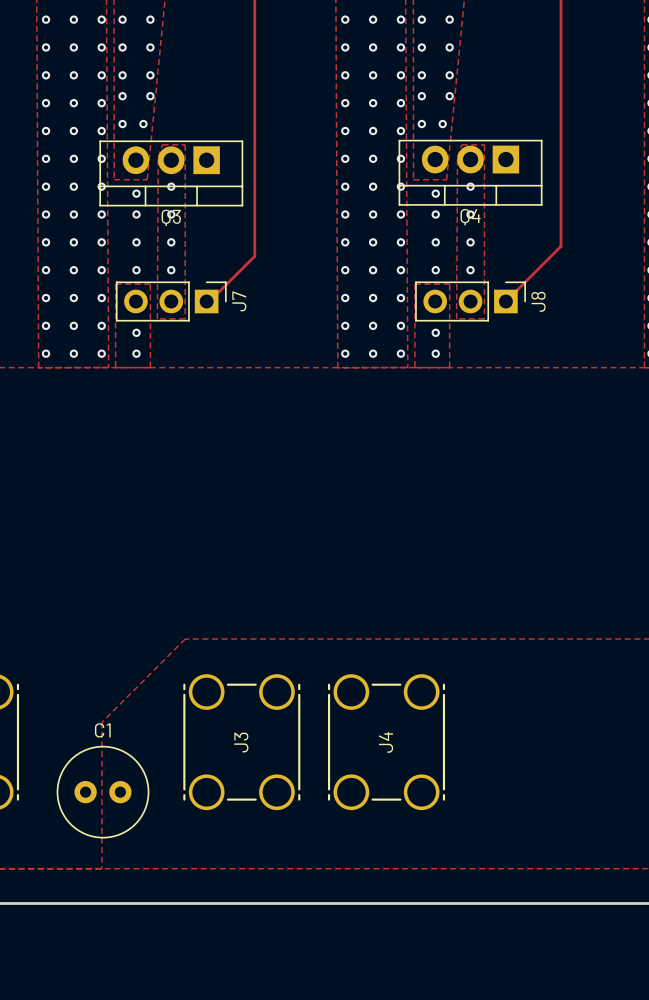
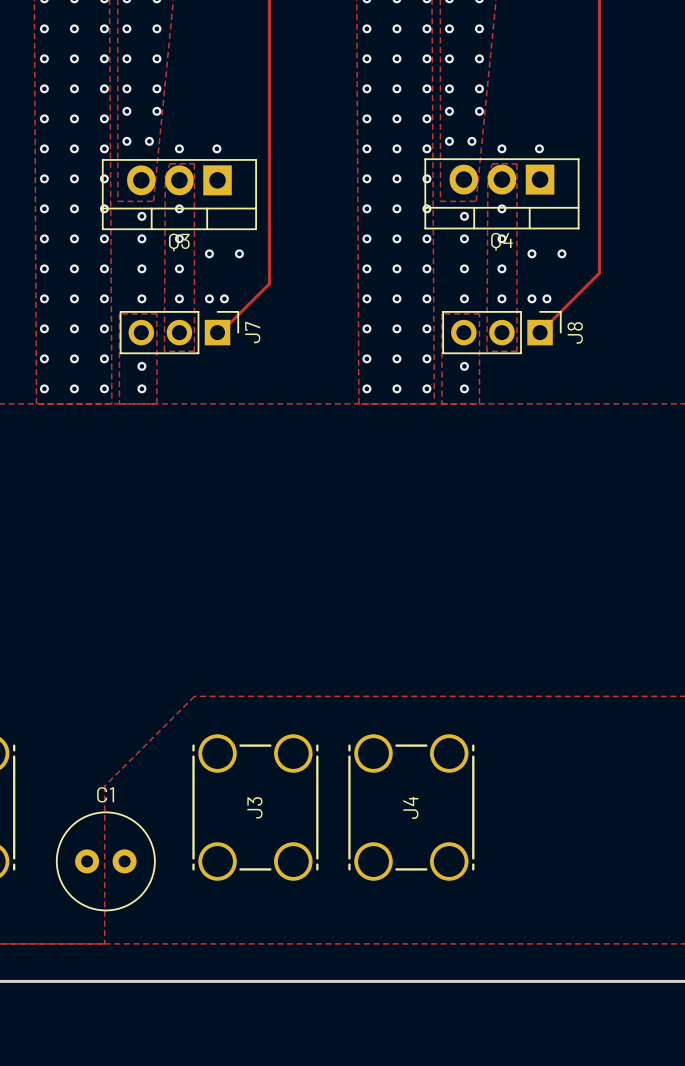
via: none -> (179, 148)
via: none -> (216, 148)
via: none -> (501, 148)
via: none -> (539, 148)
via: none -> (209, 253)
via: none -> (239, 253)
via: none -> (531, 253)
via: none -> (561, 253)
via: none -> (209, 298)
via: none -> (224, 298)
via: none -> (531, 298)
via: none -> (546, 298)

